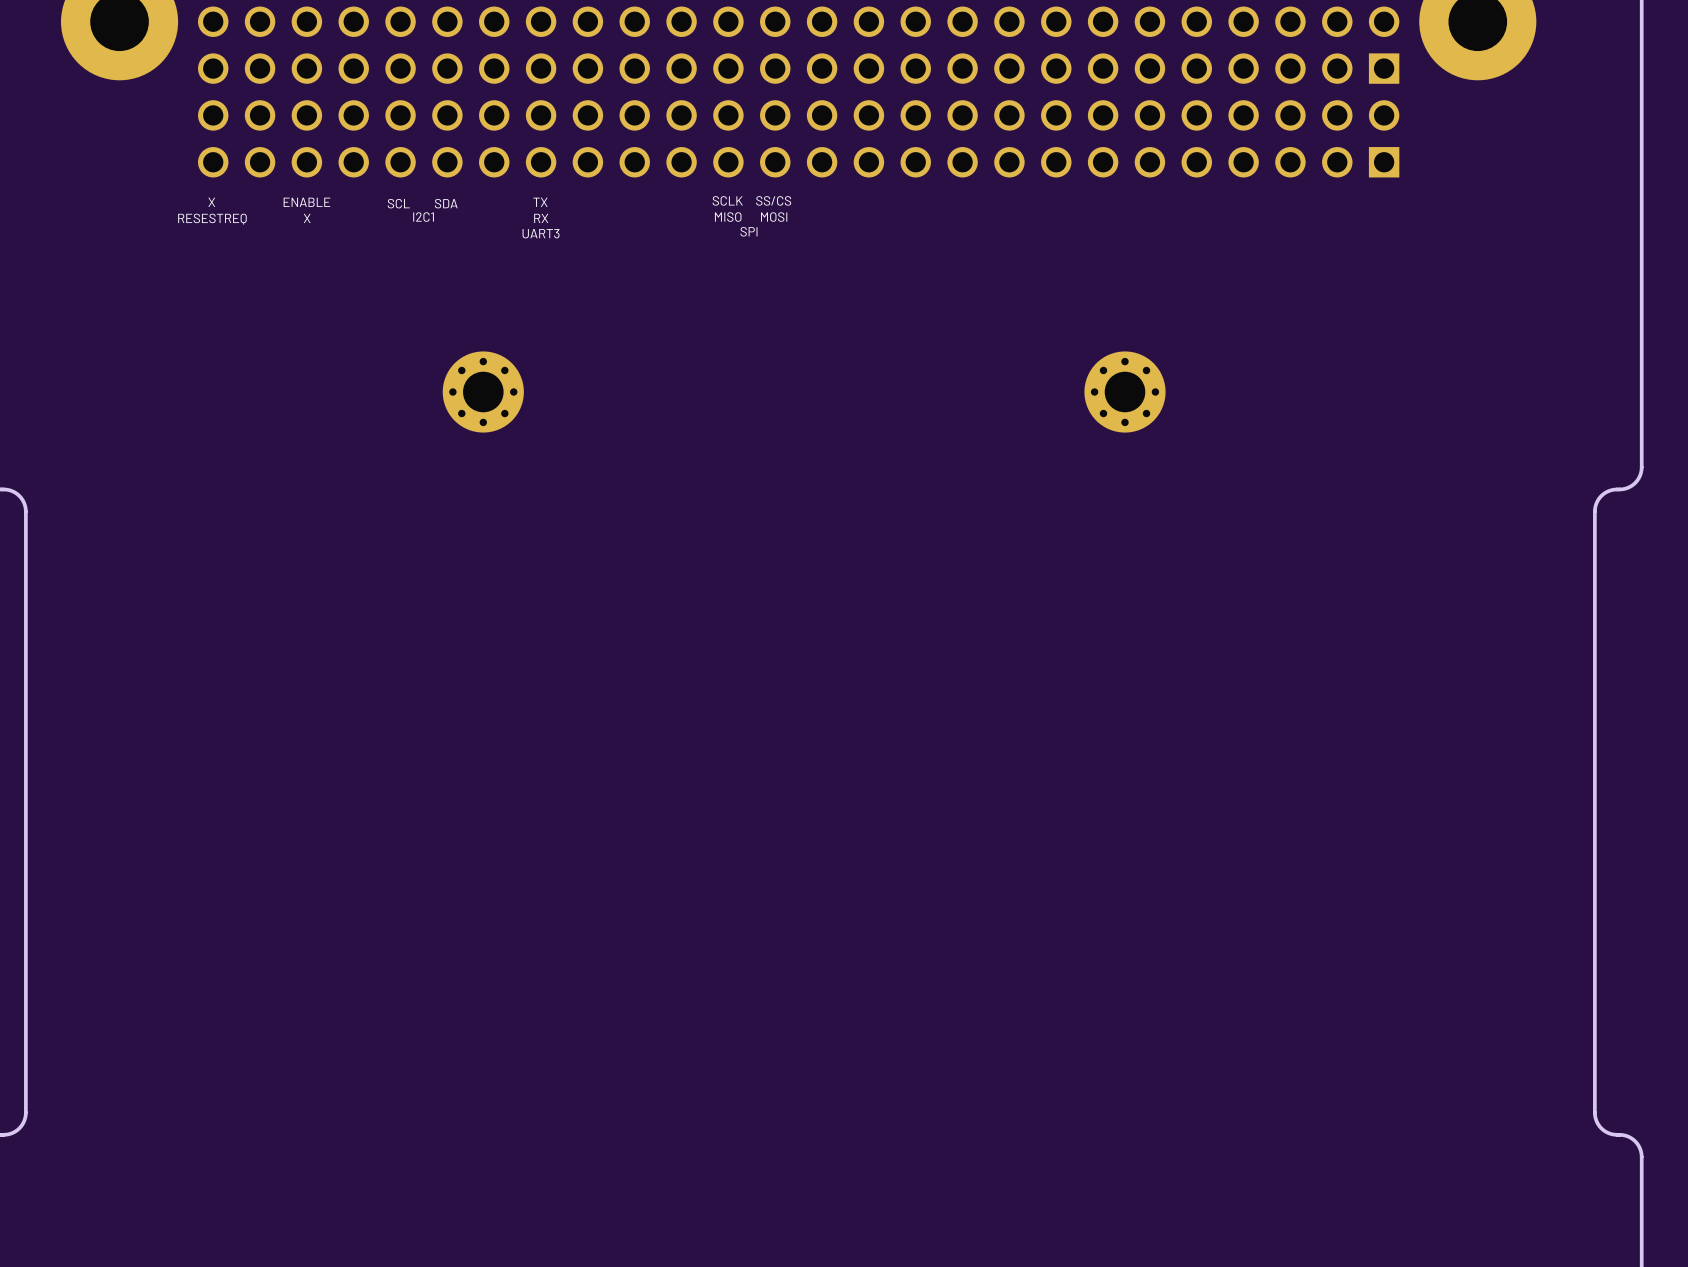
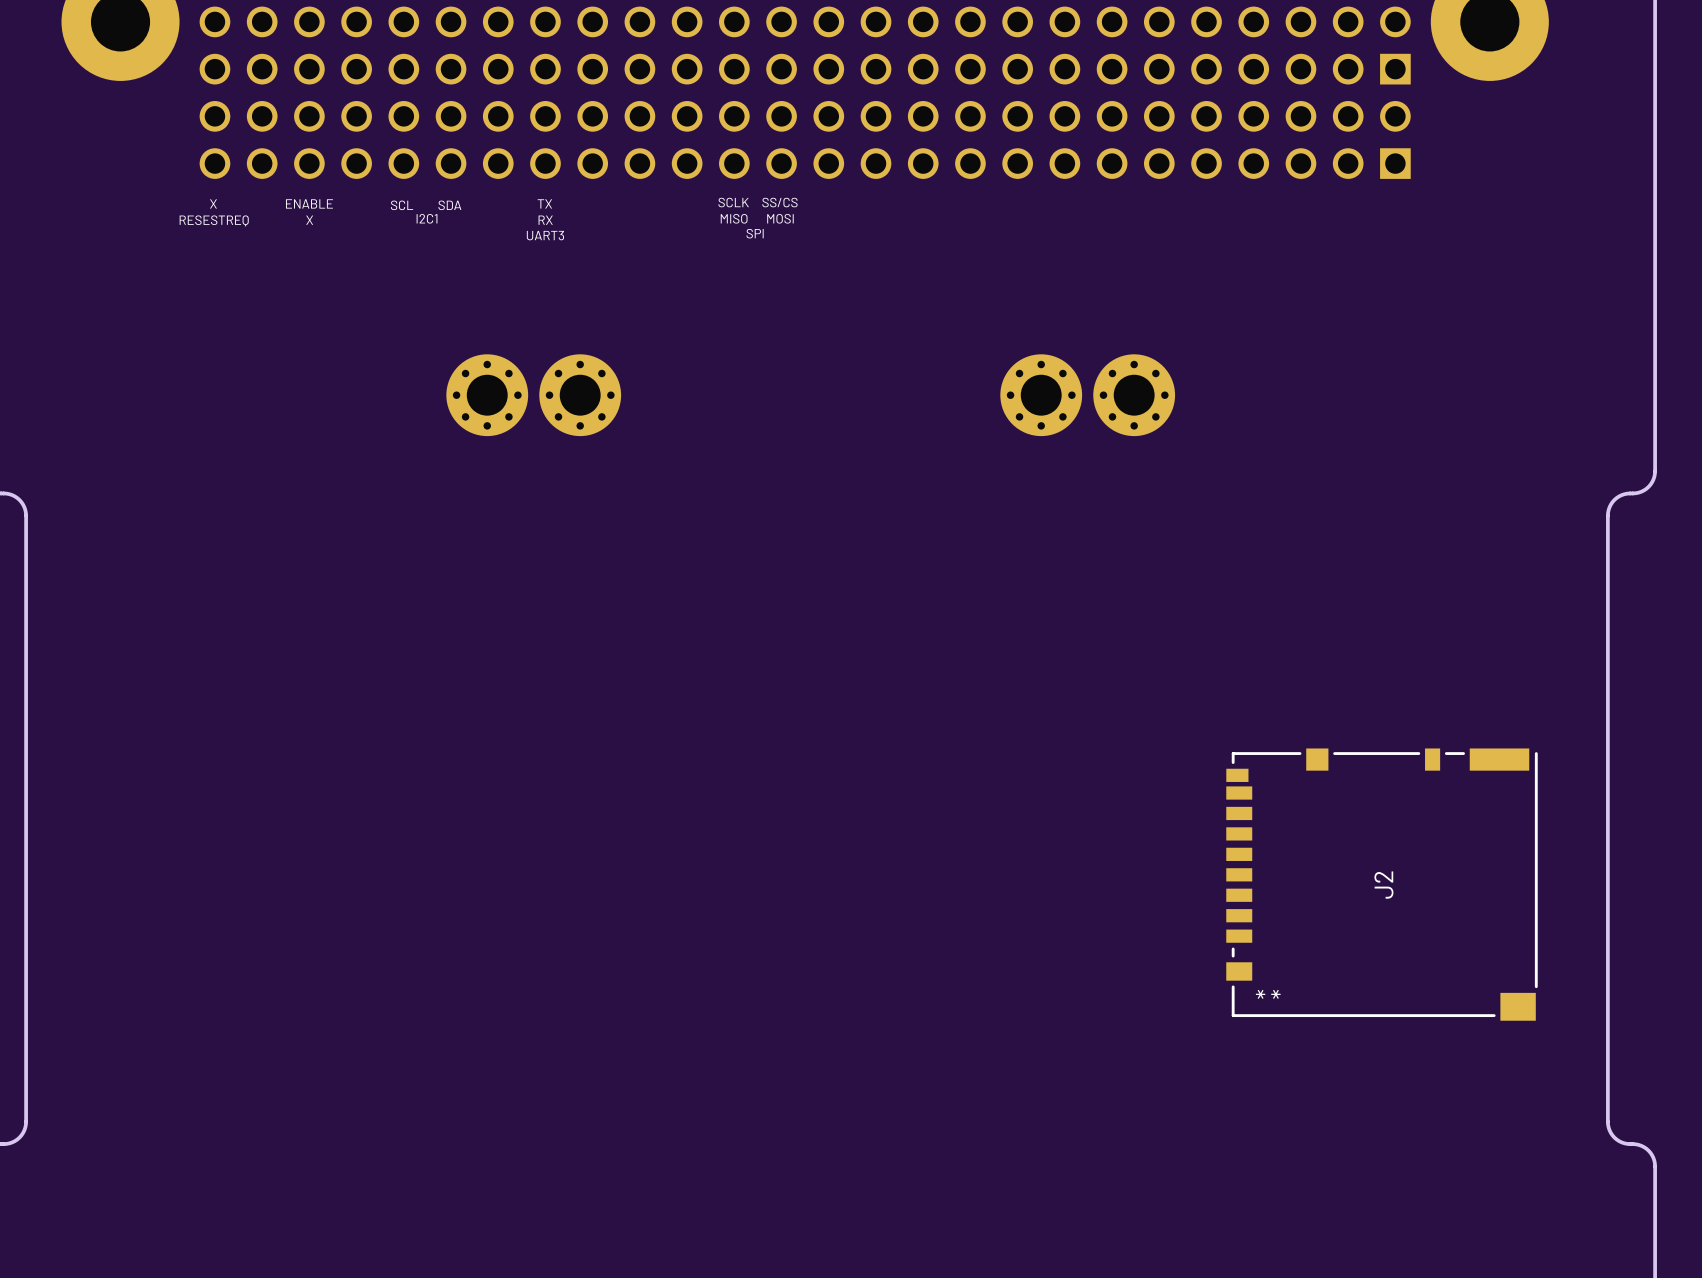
part: none -> (580, 395)
part: none -> (1041, 395)
J2: none -> (1381, 884)

